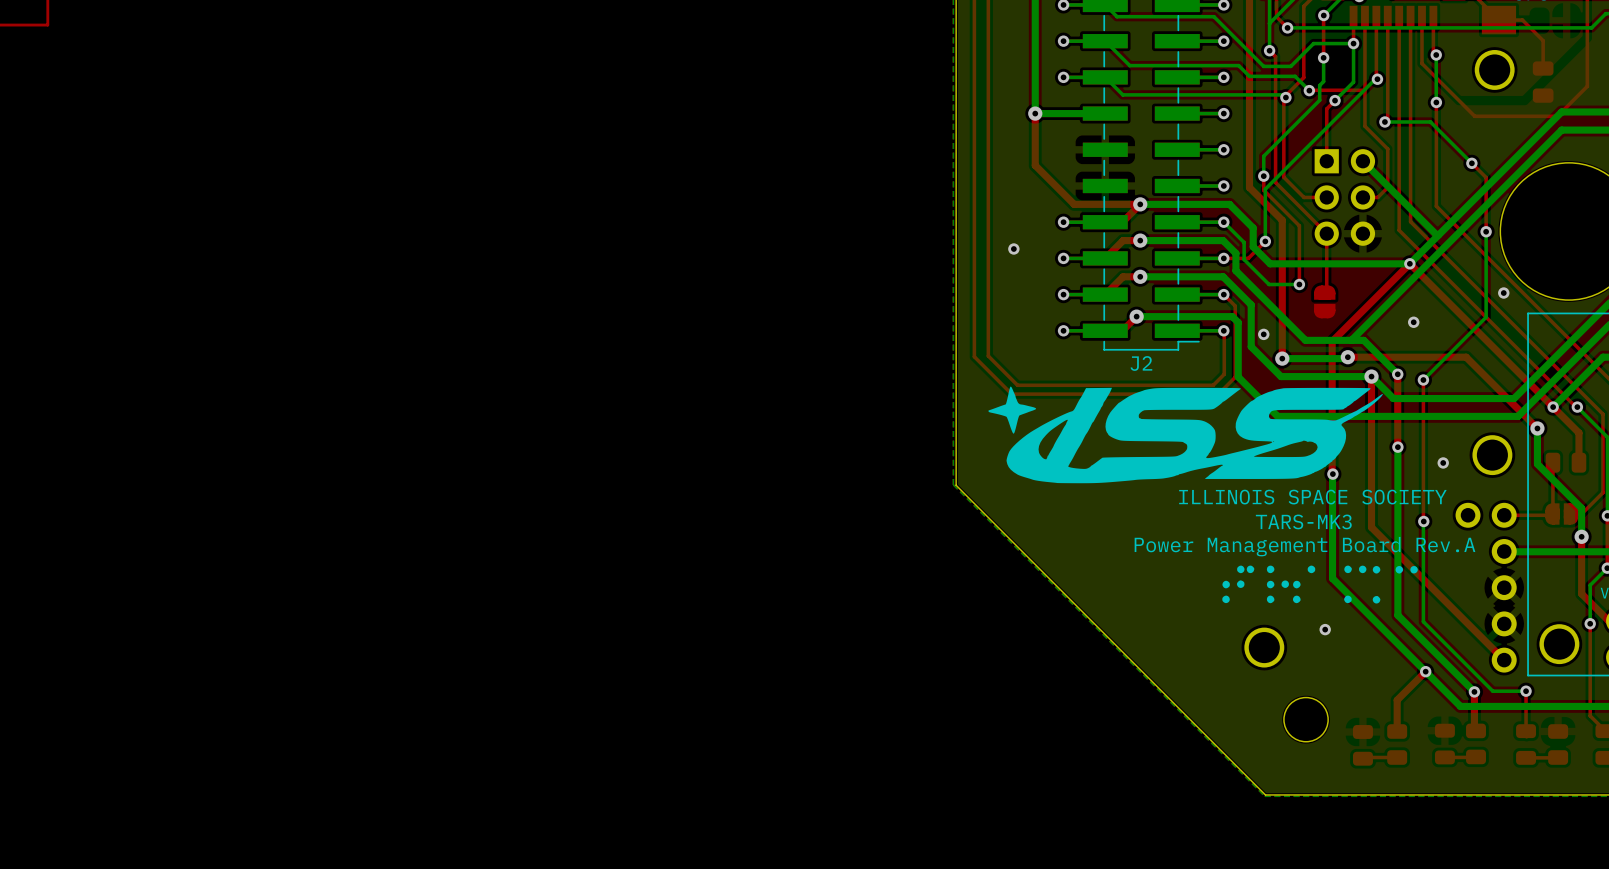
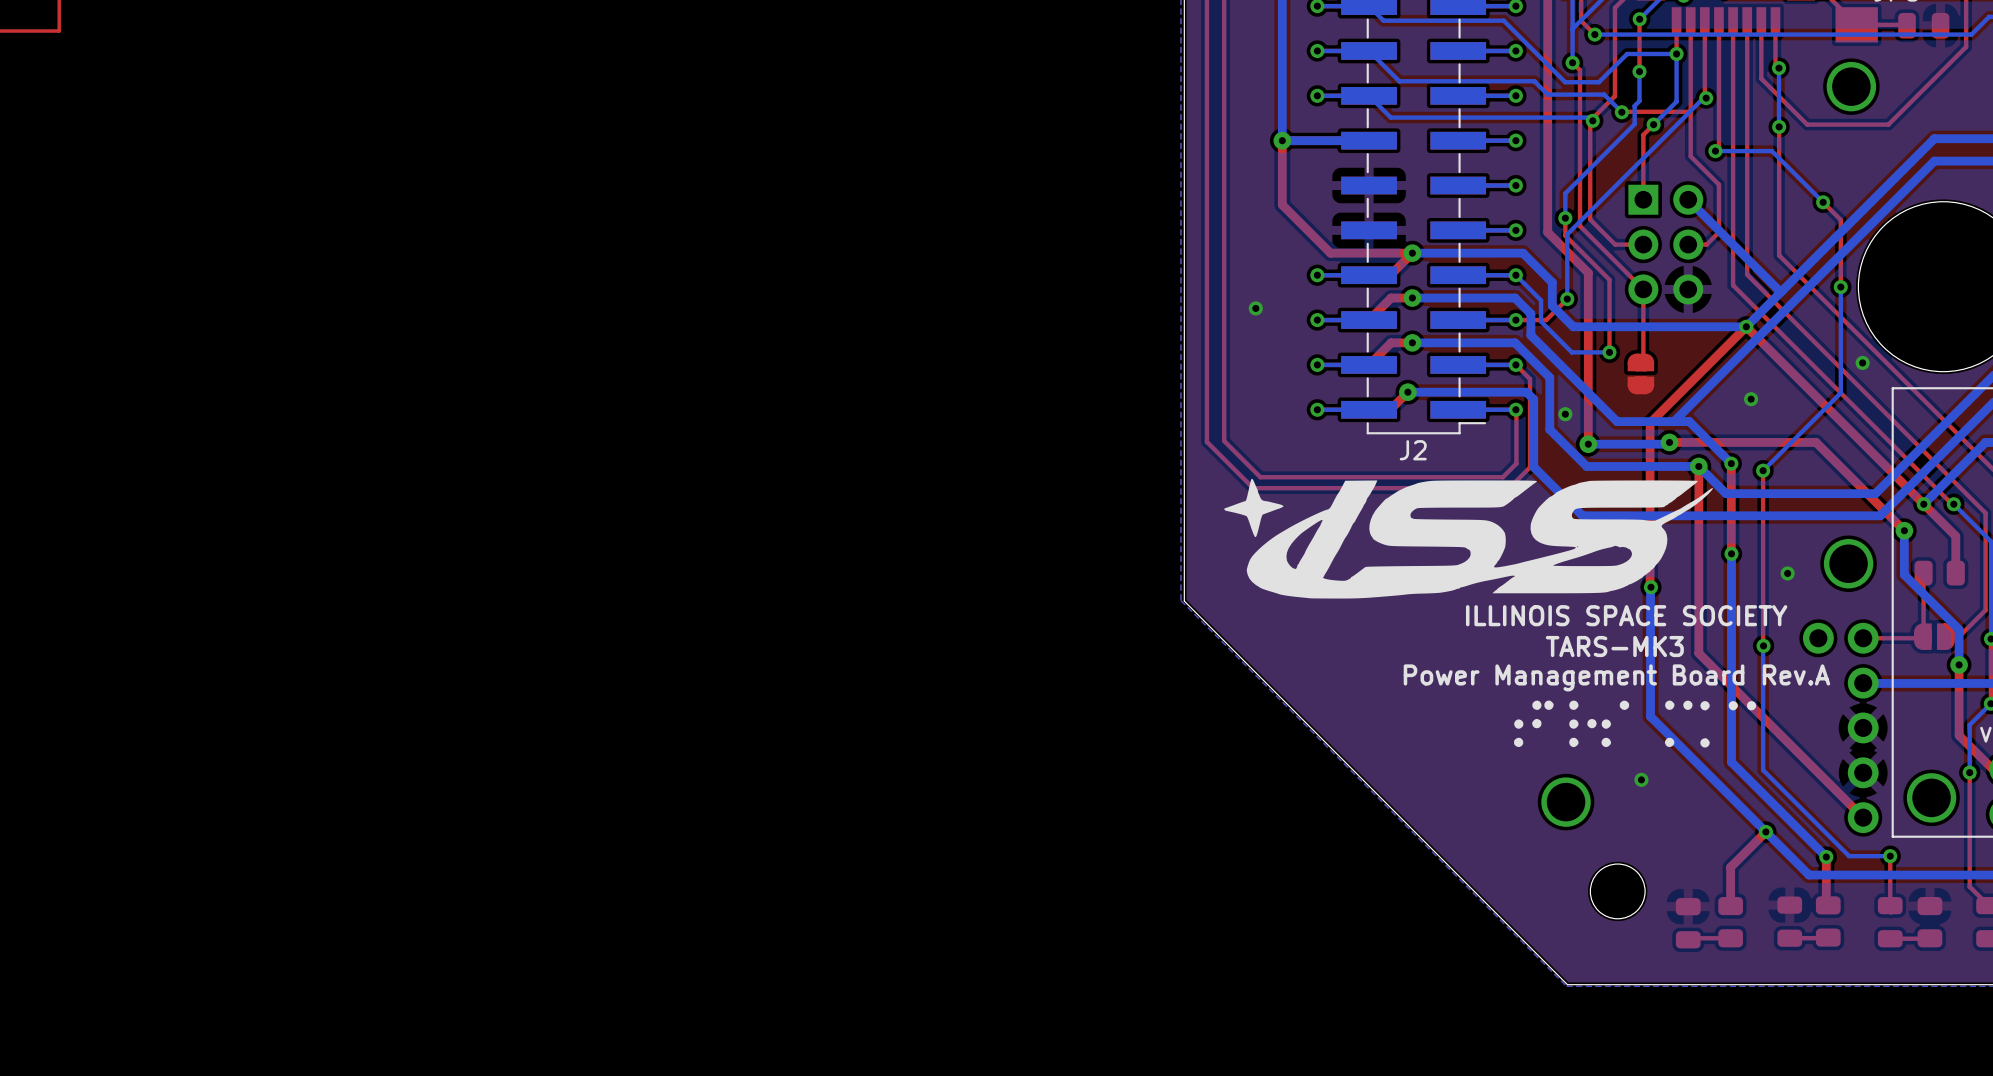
top track: (1522, 20) (1543, 40) (1543, 68) -> (1885, 24) (1907, 25)
top track: (1587, 37) (1587, 86) (1557, 116) (1474, 116) (1459, 100) -> (1966, 46) (1888, 124) (1807, 124)
part rotation: 0° (1543, 82) -> 90° clockwise (1923, 25)
part position: (1543, 82) -> (1923, 25)

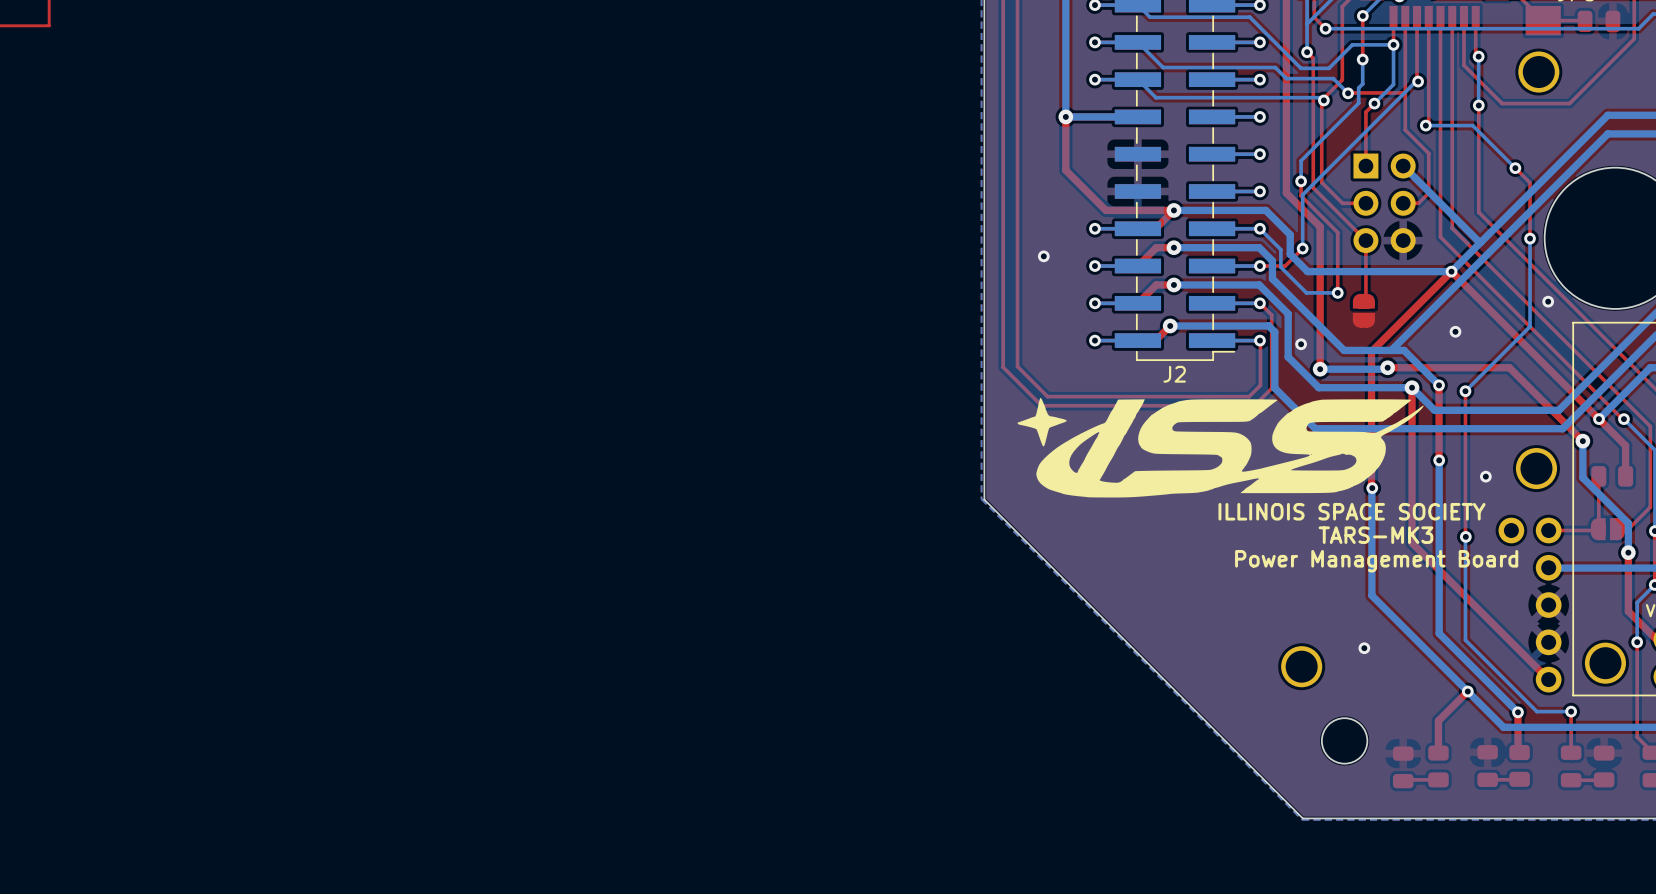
text position: TARS-MK3 (1614, 646) -> TARS-MK3 (1375, 535)
text: Power Management Board Rev.A (1616, 677) -> Power Management Board (1376, 561)
drawing: [1514, 700, 1757, 748] -> none

